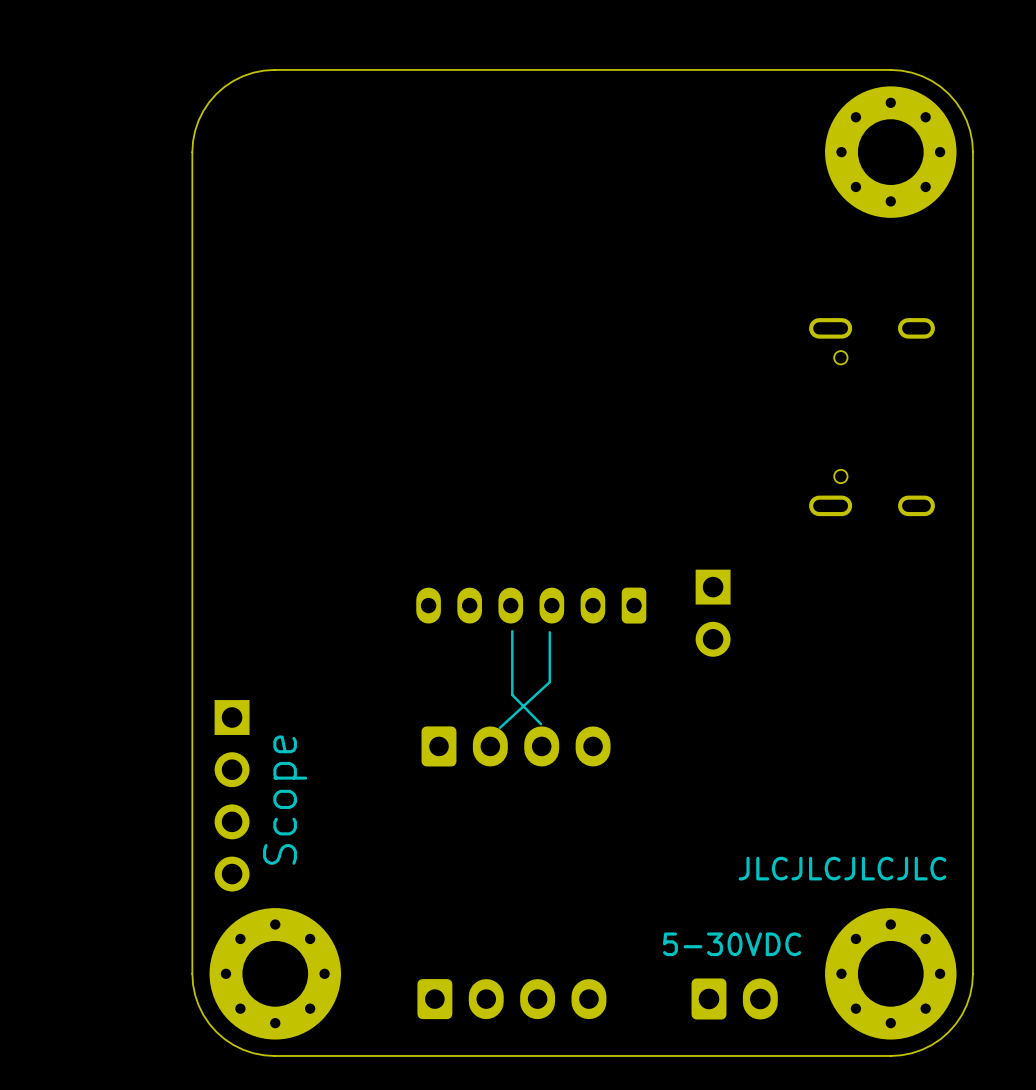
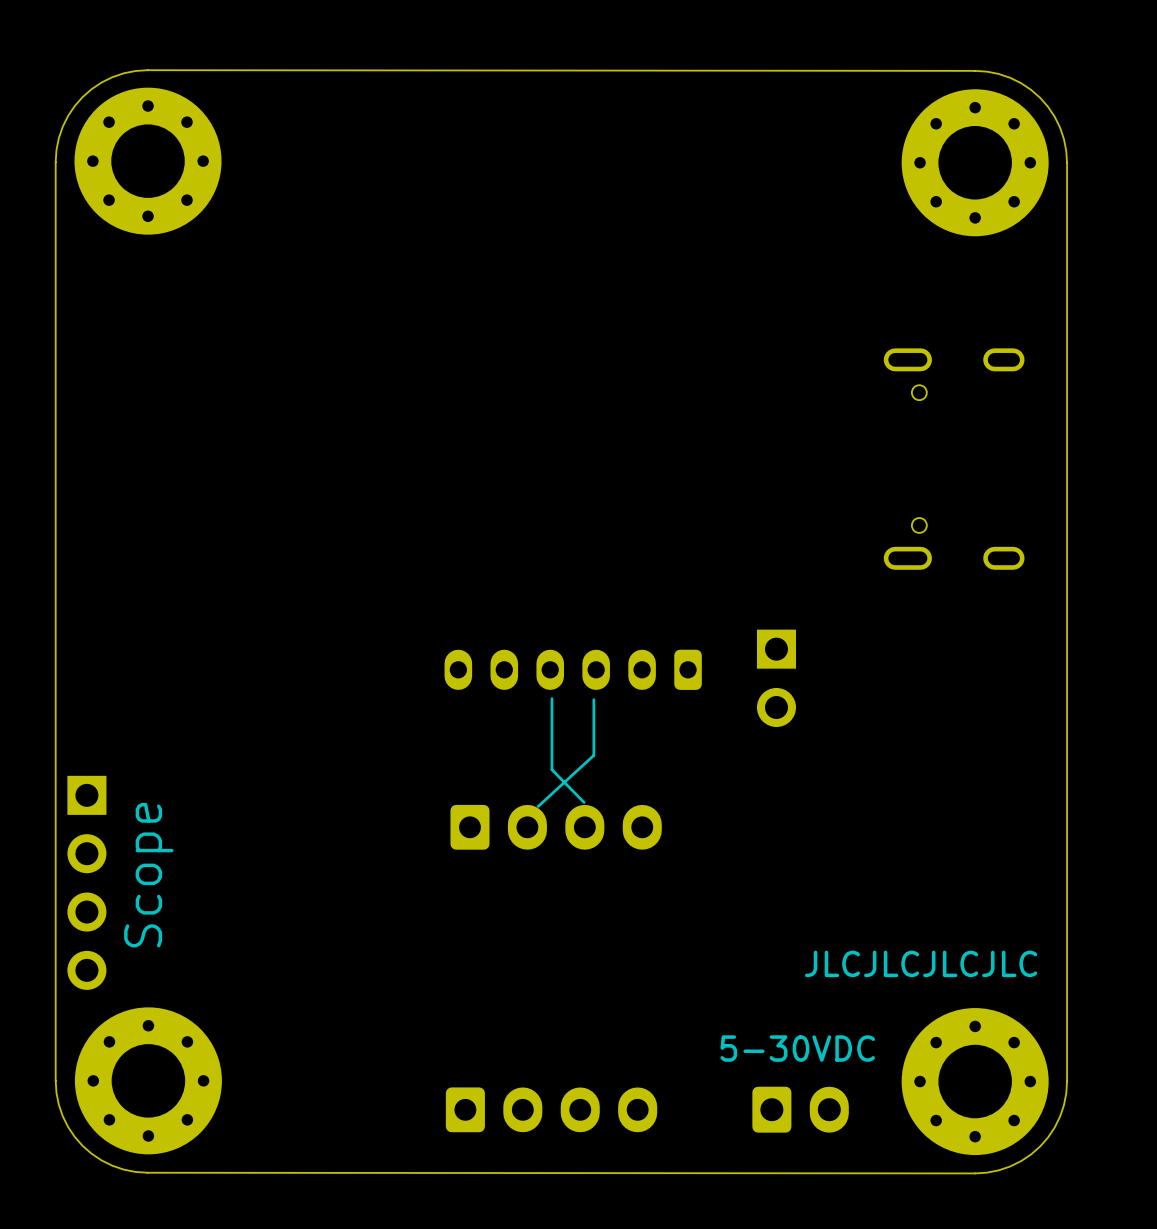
board edge: (890, 69) (263, 70) (233, 80) (216, 94) (198, 120) (192, 152) (192, 973) (195, 995) (209, 1023) (224, 1039) (243, 1049) (274, 1055) (890, 1055) -> (975, 70) (135, 70) (112, 77) (91, 89) (82, 97) (68, 116) (62, 126) (58, 138) (55, 162) (55, 1080) (58, 1104) (62, 1116) (68, 1126) (82, 1145) (101, 1160) (112, 1165) (123, 1169) (147, 1172) (975, 1173)
part: none -> (148, 161)
part position: (232, 795) -> (86, 882)
text position: Scope (285, 800) -> Scope (148, 875)
part position: (275, 973) -> (148, 1080)

